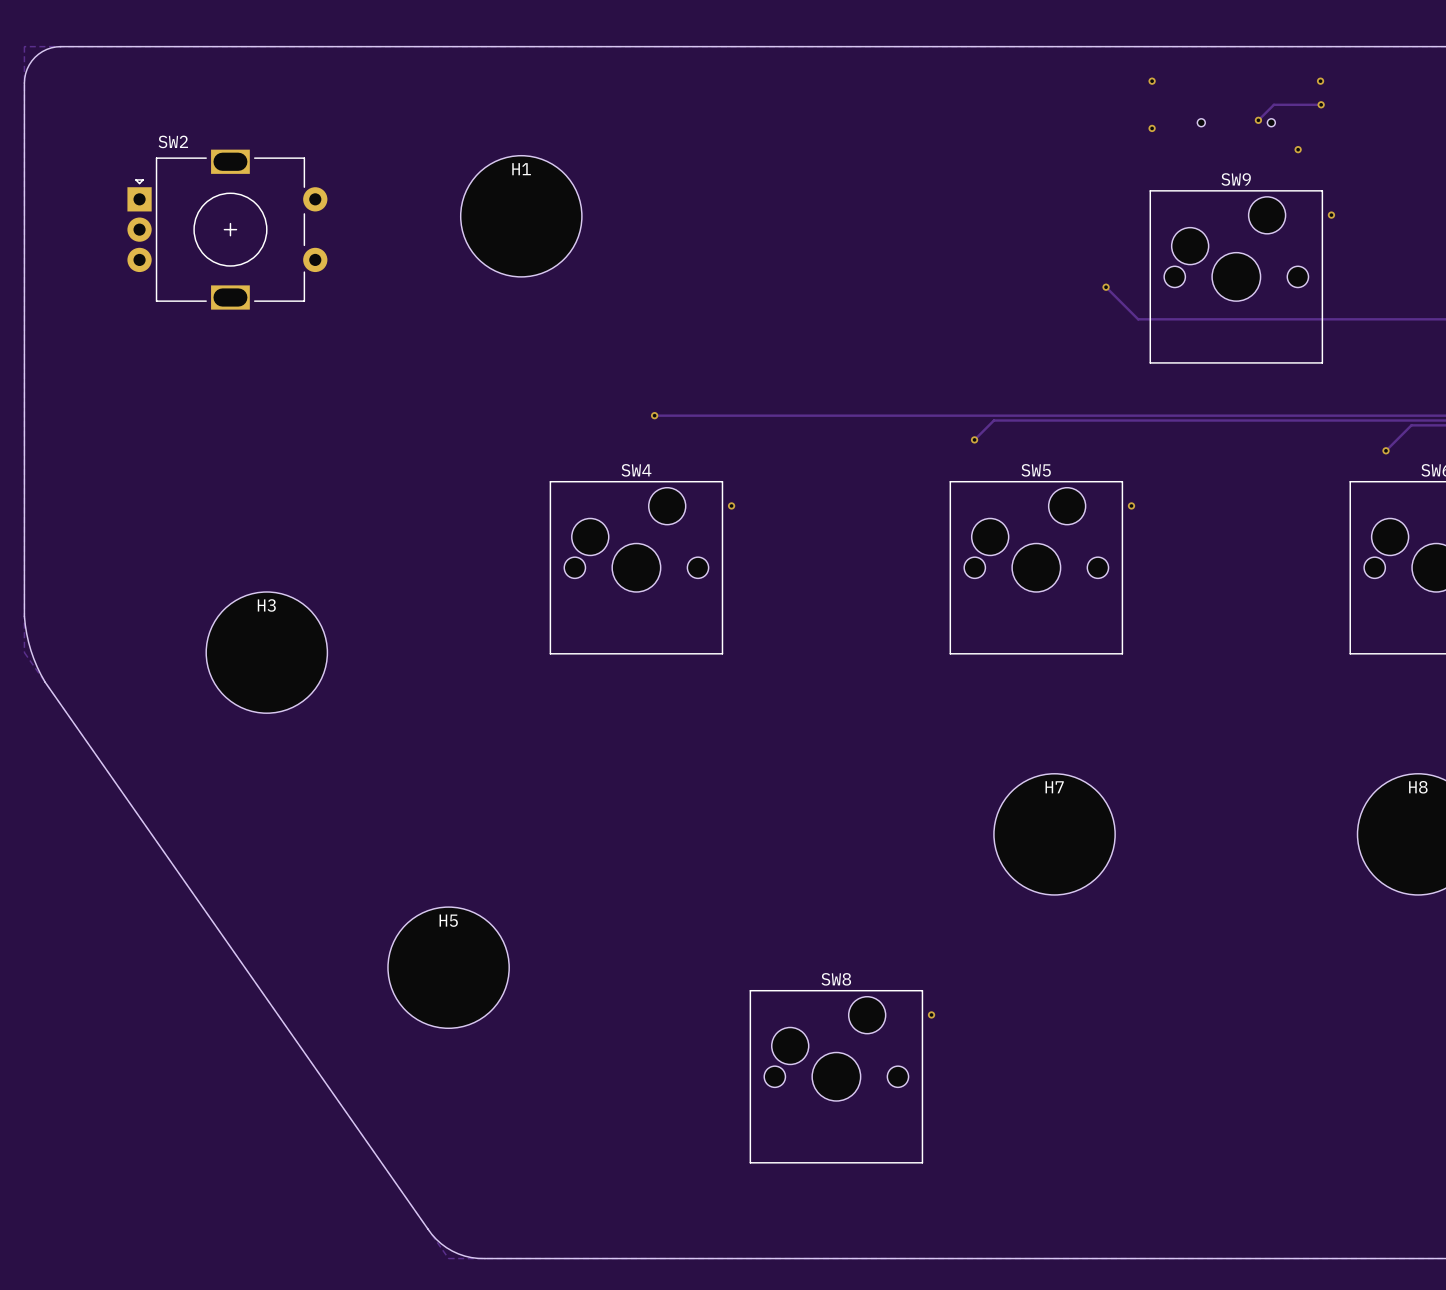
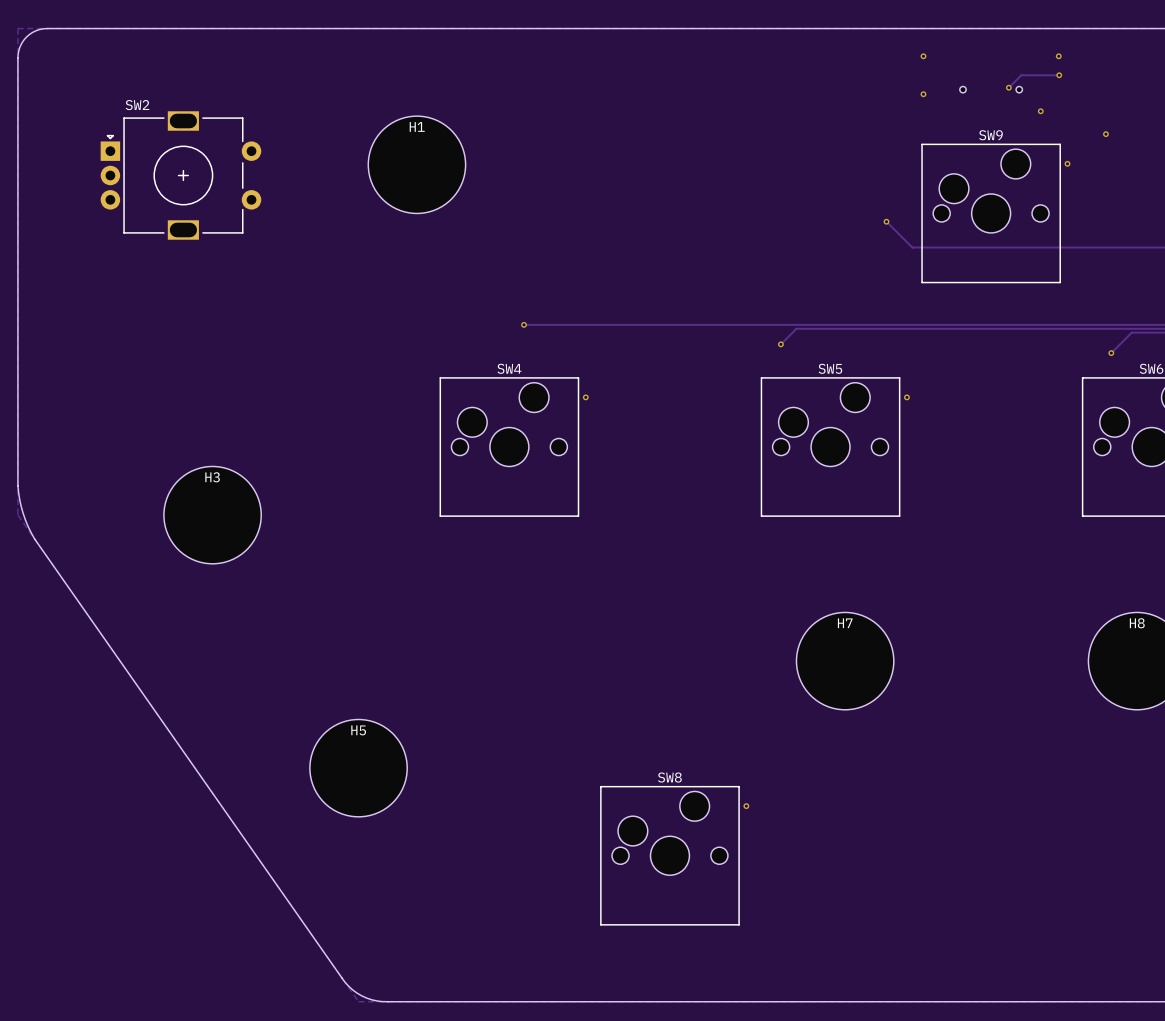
via: none -> (1105, 134)

